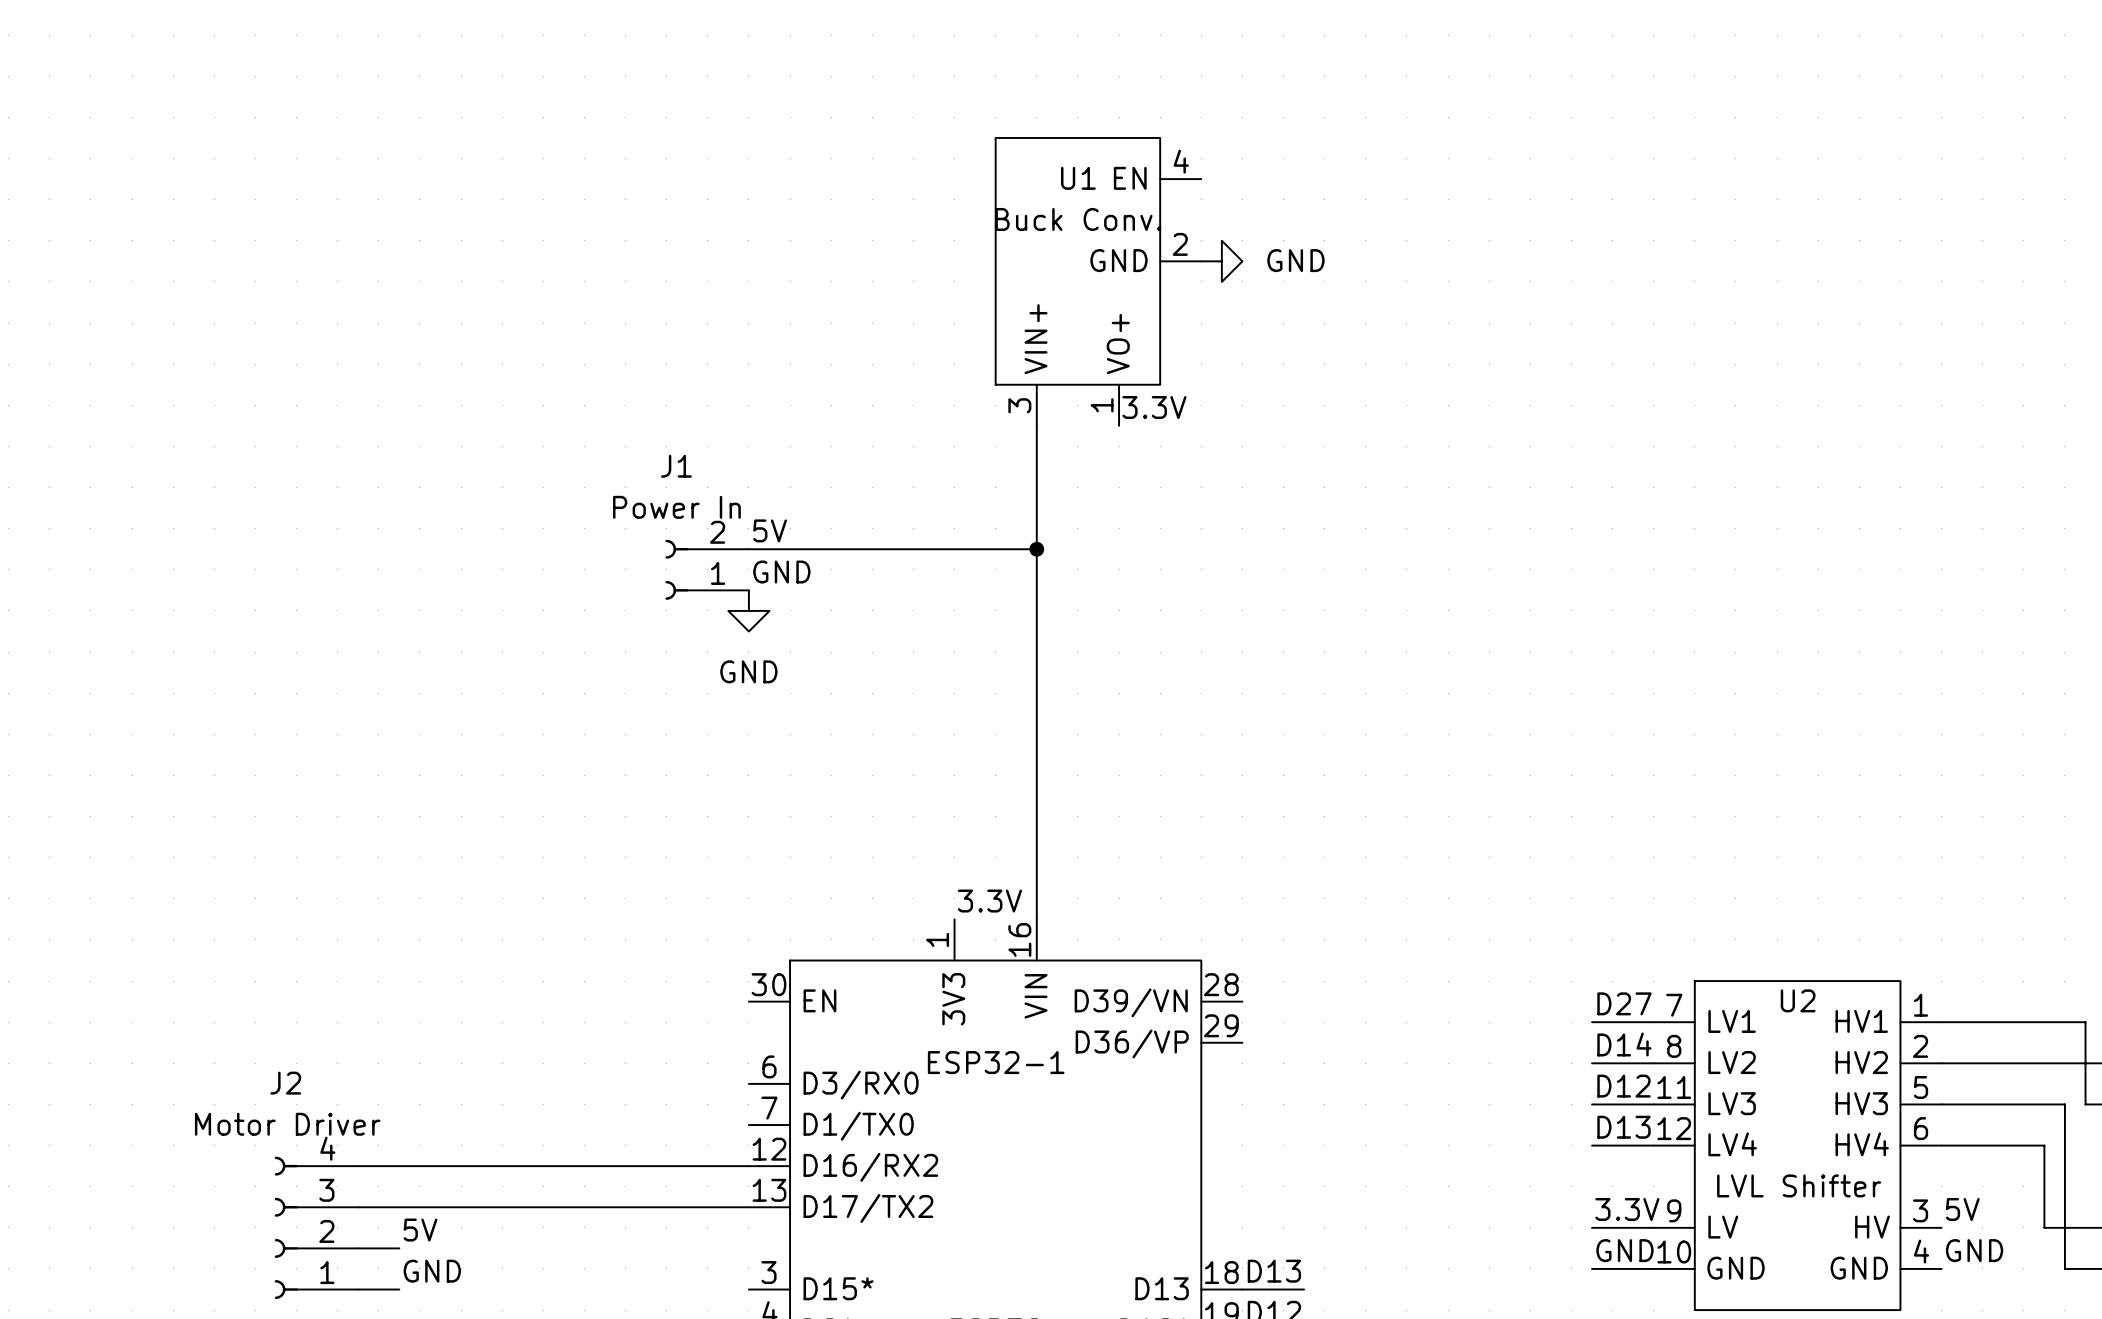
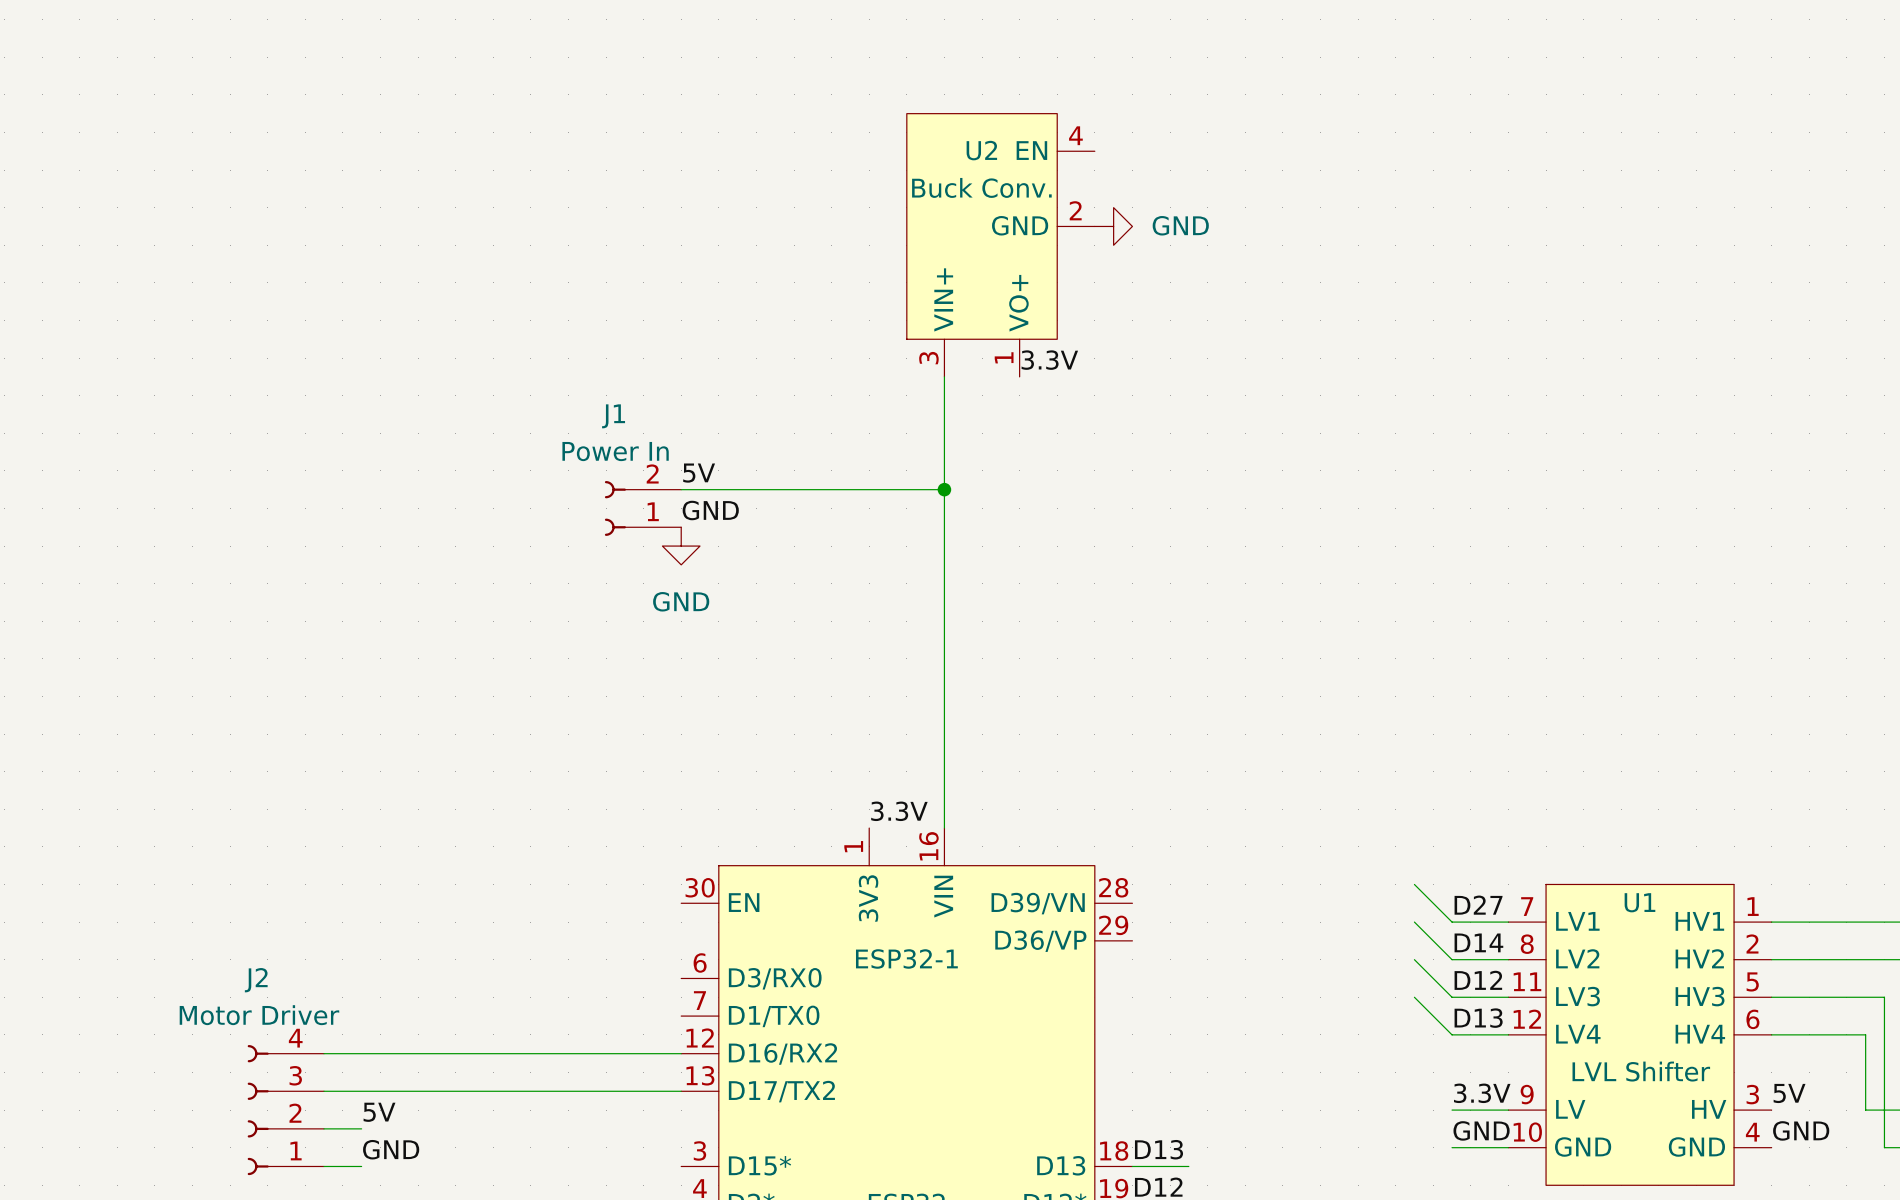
U1 name: U1 (1078, 178) -> U2 (981, 150)
wire: none -> (1414, 884) (1452, 922)
U2 name: U2 (1798, 1000) -> U1 (1639, 902)
wire: none -> (1414, 922) (1452, 959)
wire: none -> (1414, 959) (1452, 997)
wire: none -> (1414, 997) (1452, 1034)

